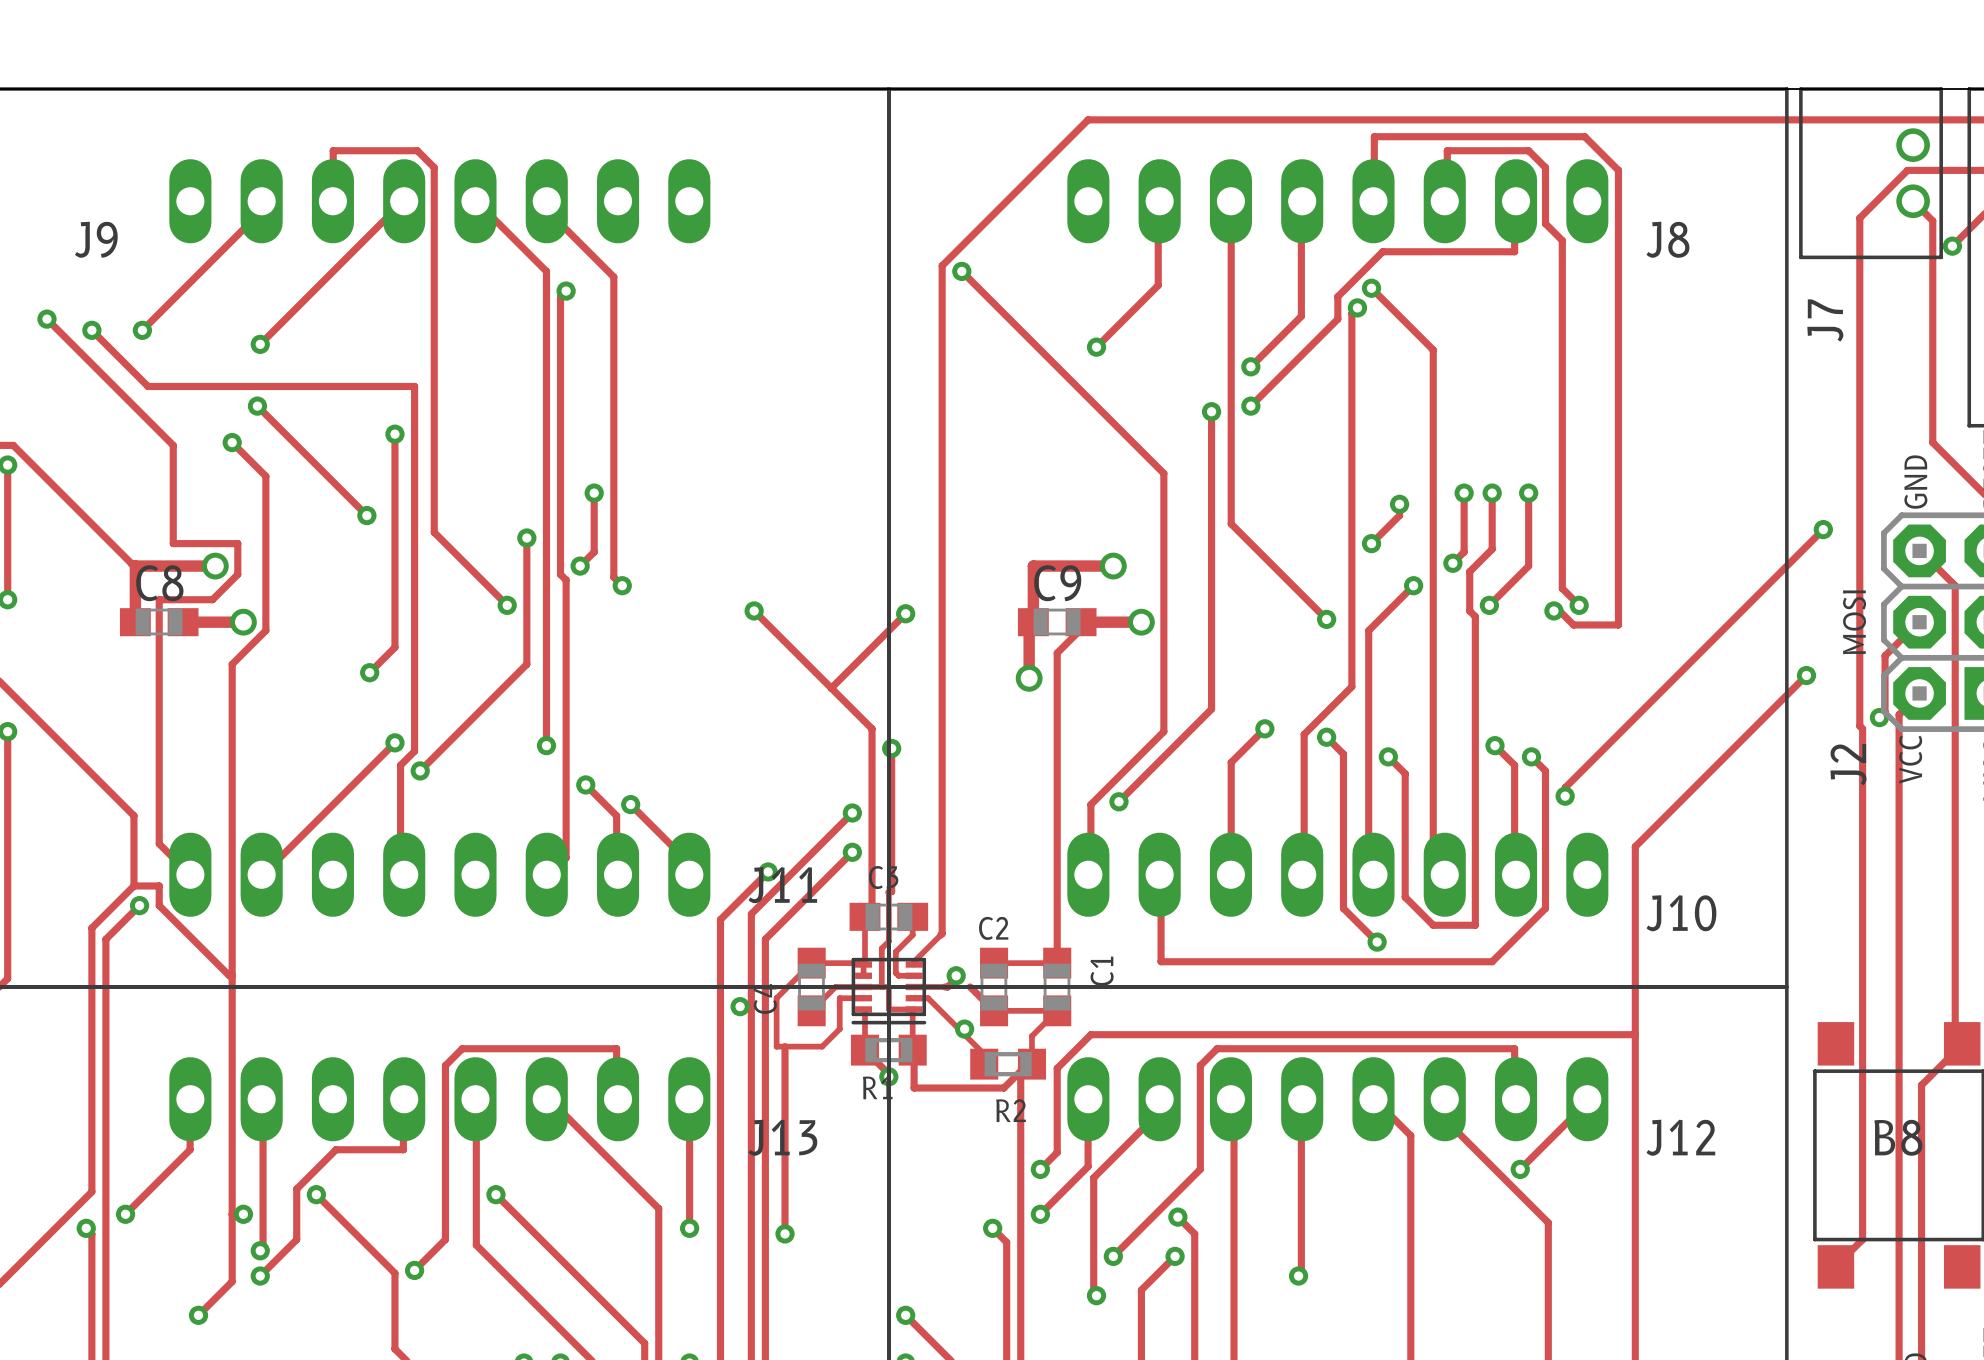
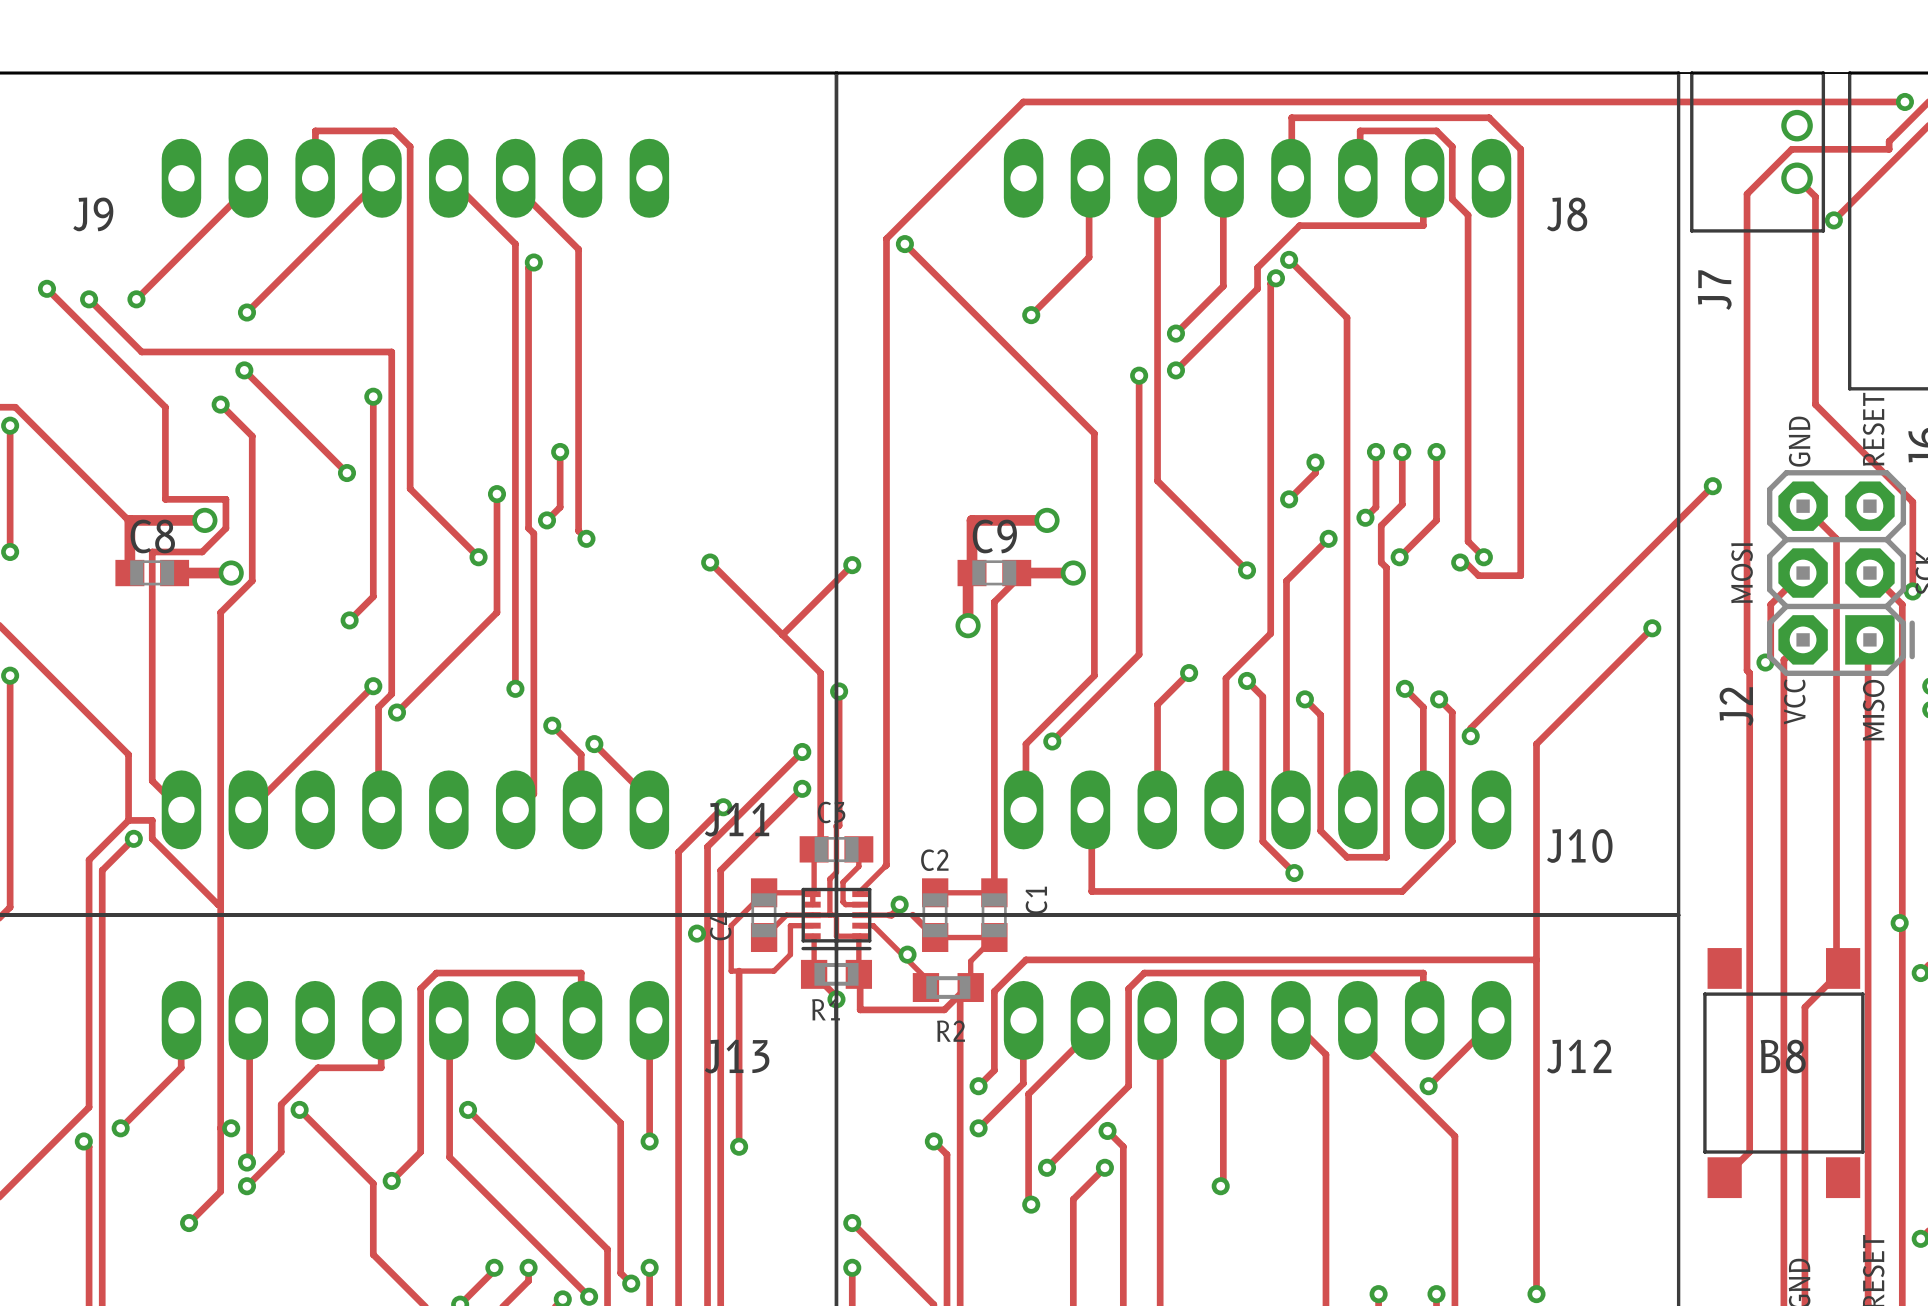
track: (1806, 675) (1635, 846) -> (1652, 628) (1536, 744) (1536, 783)
via position: (1806, 675) -> (1652, 628)

